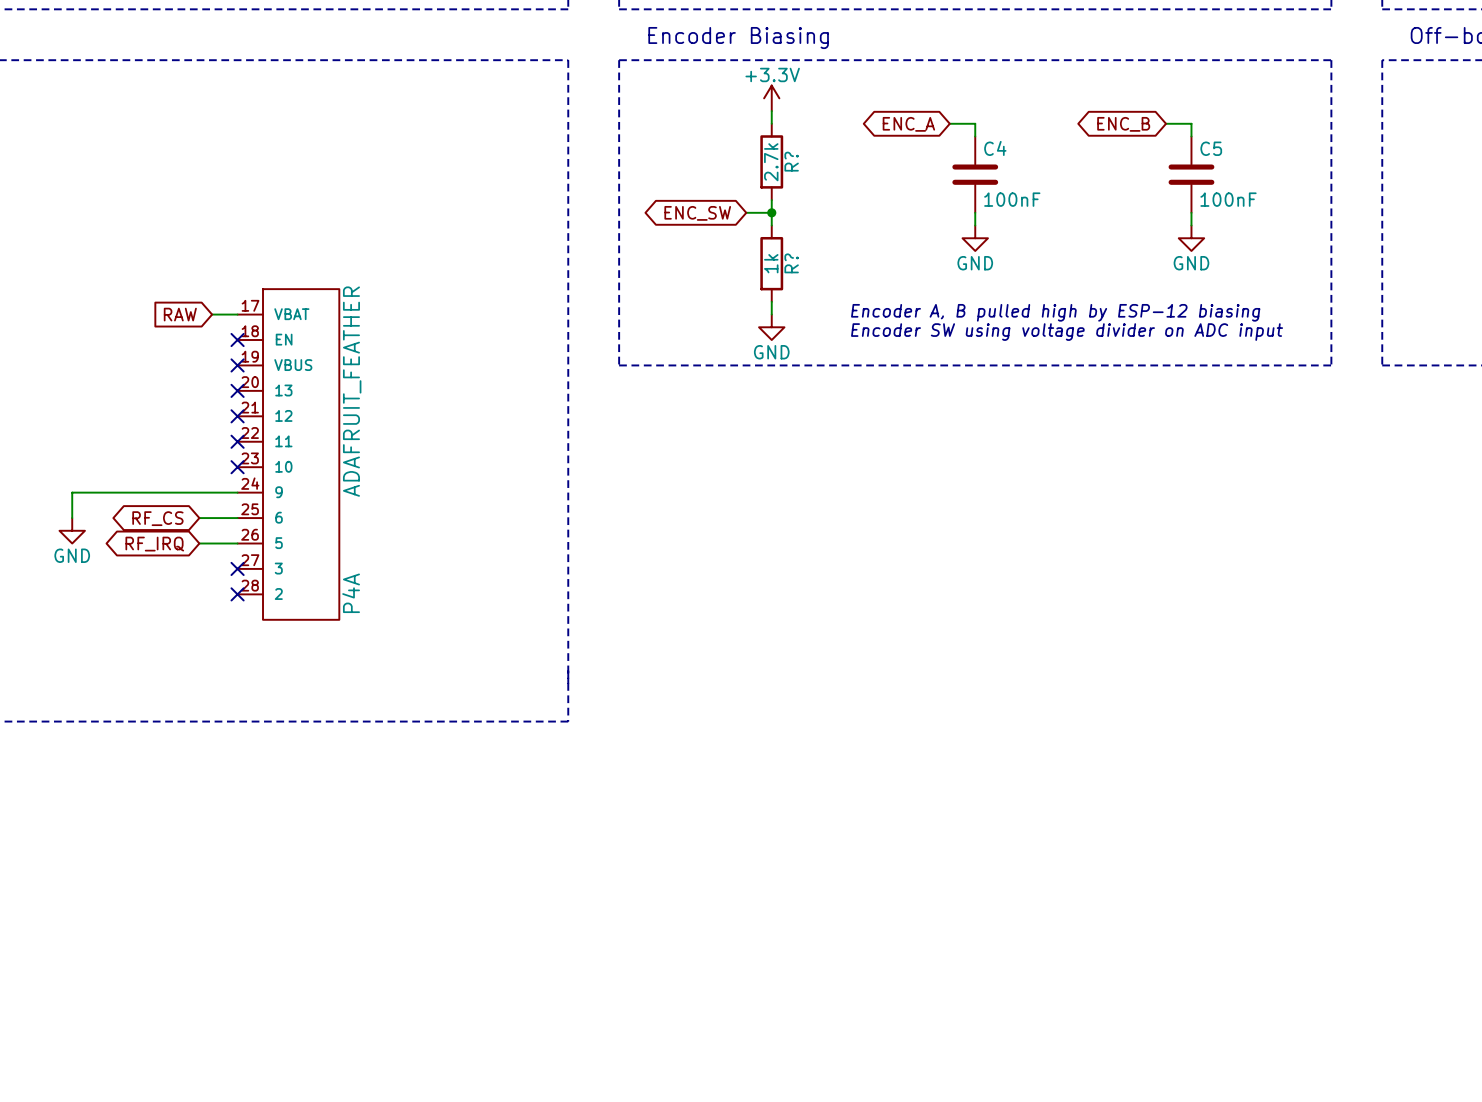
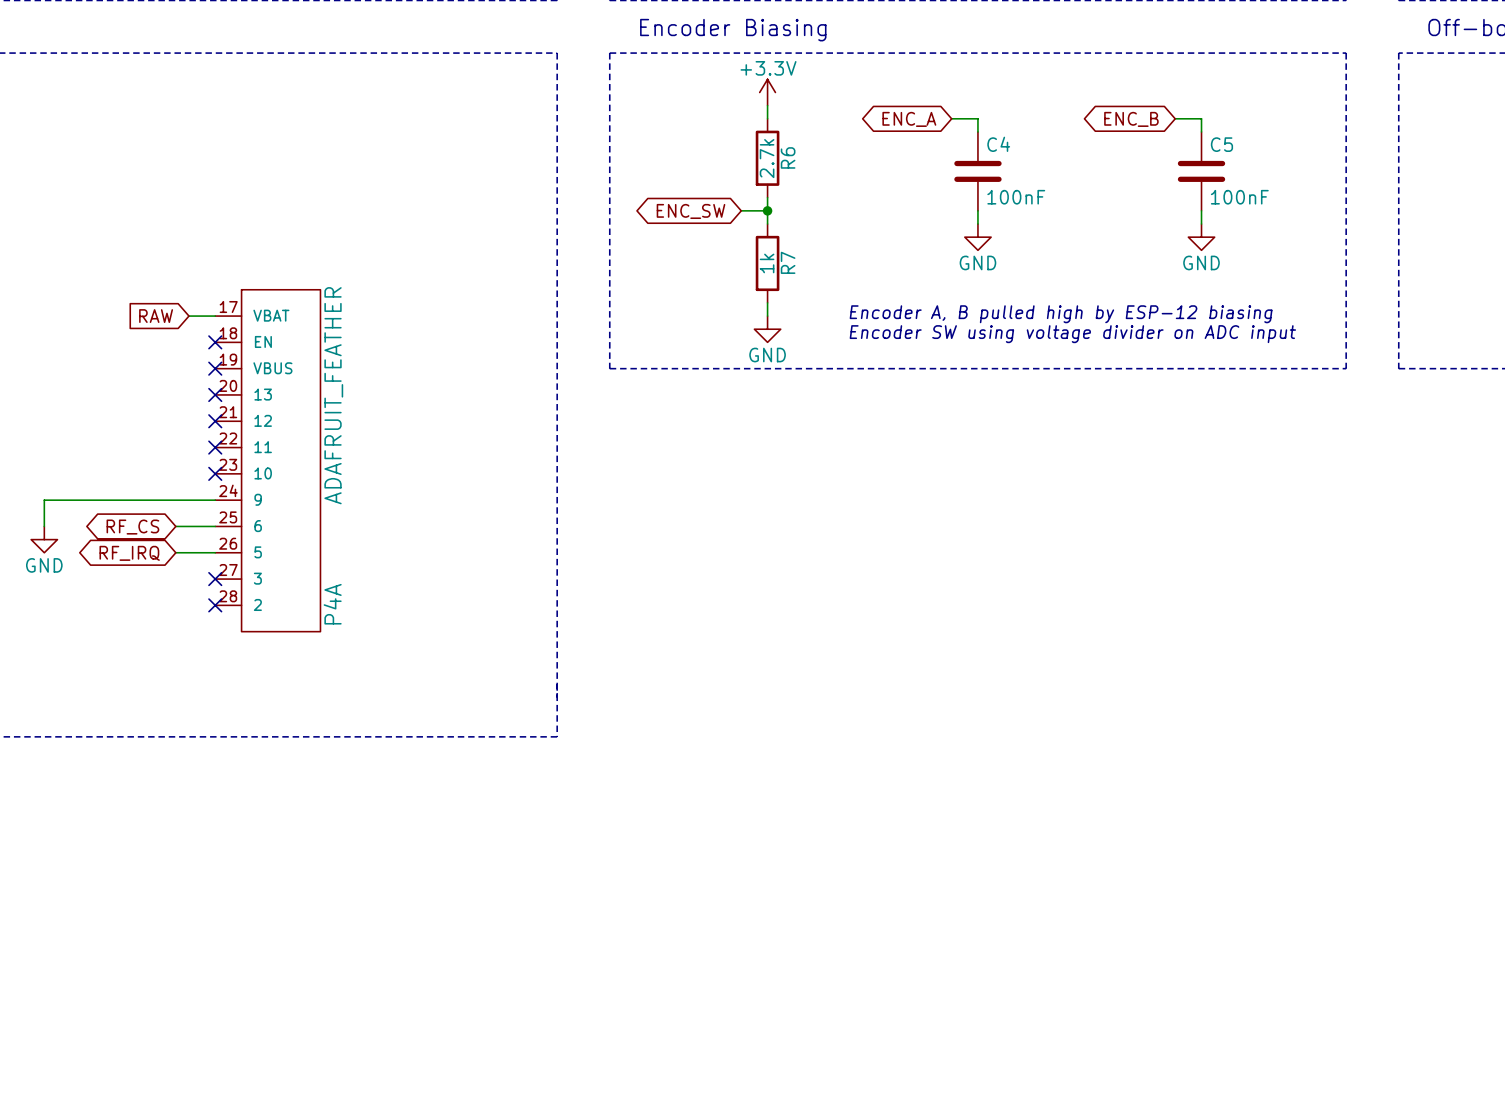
R? name: R? (791, 161) -> R6 (788, 157)
R? name: R? (791, 263) -> R7 (788, 262)

